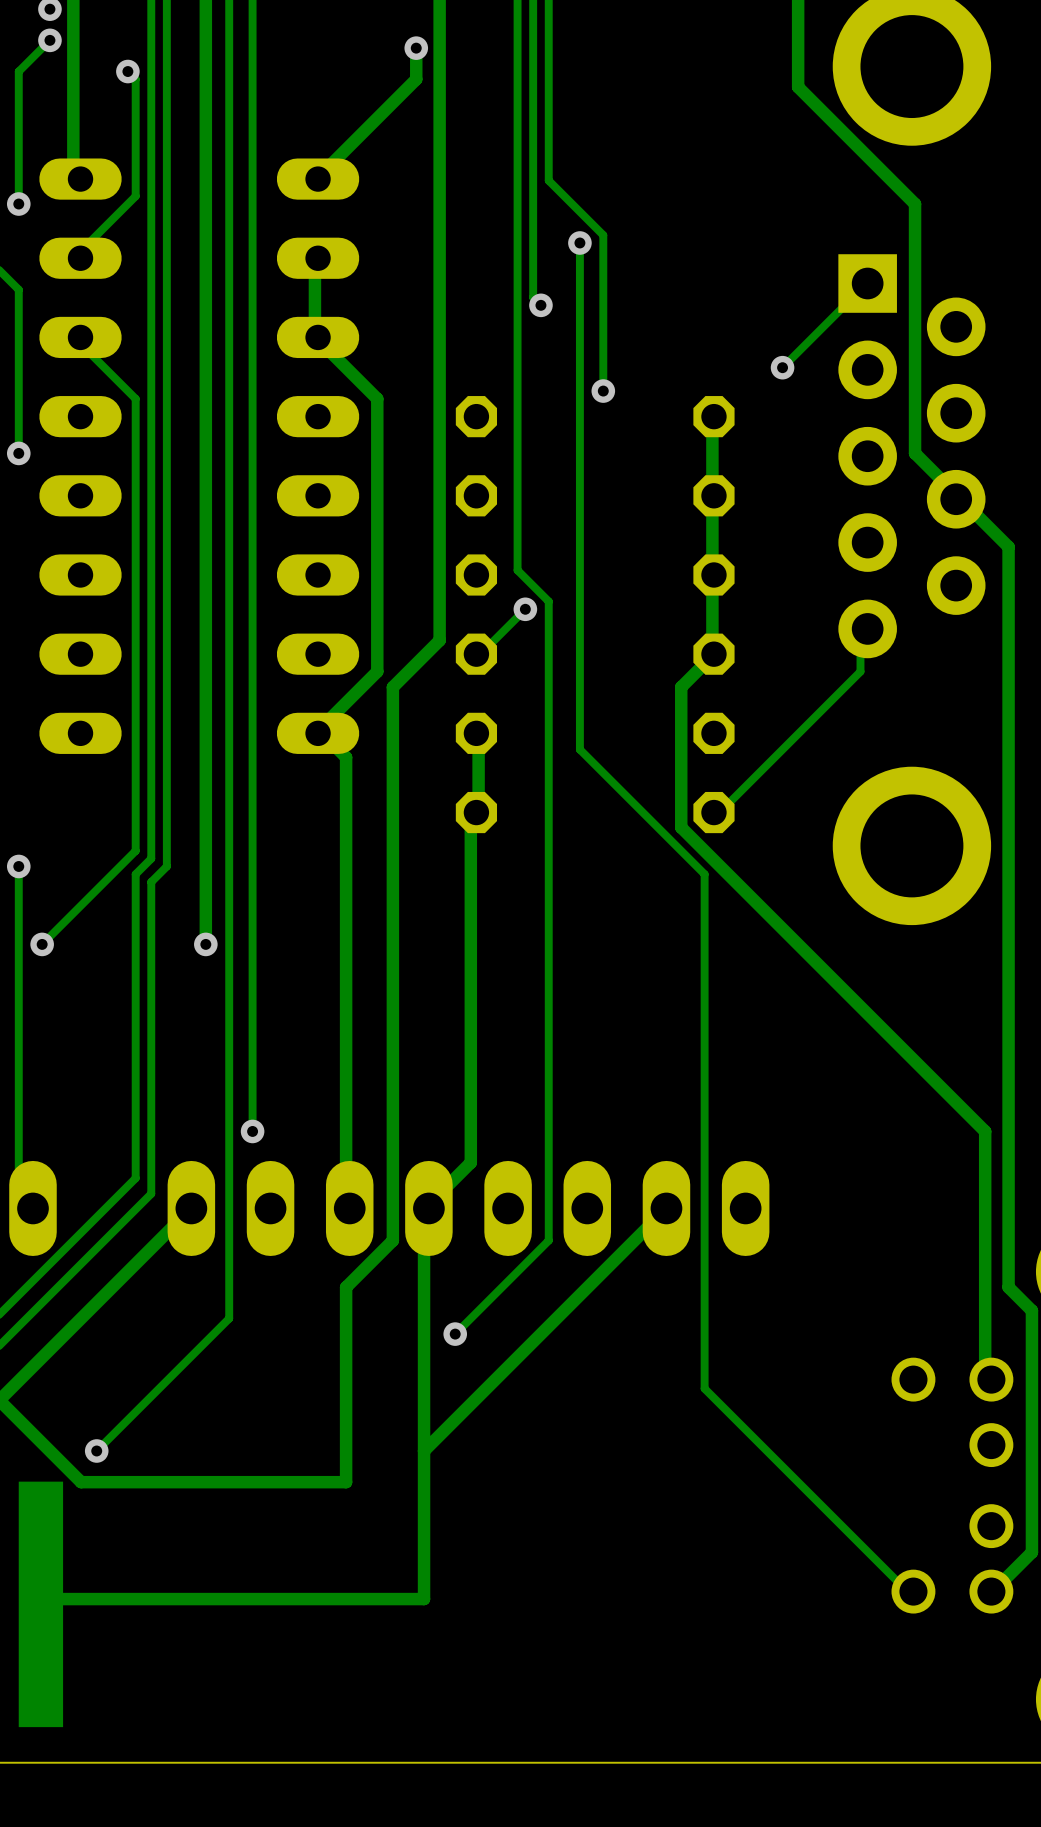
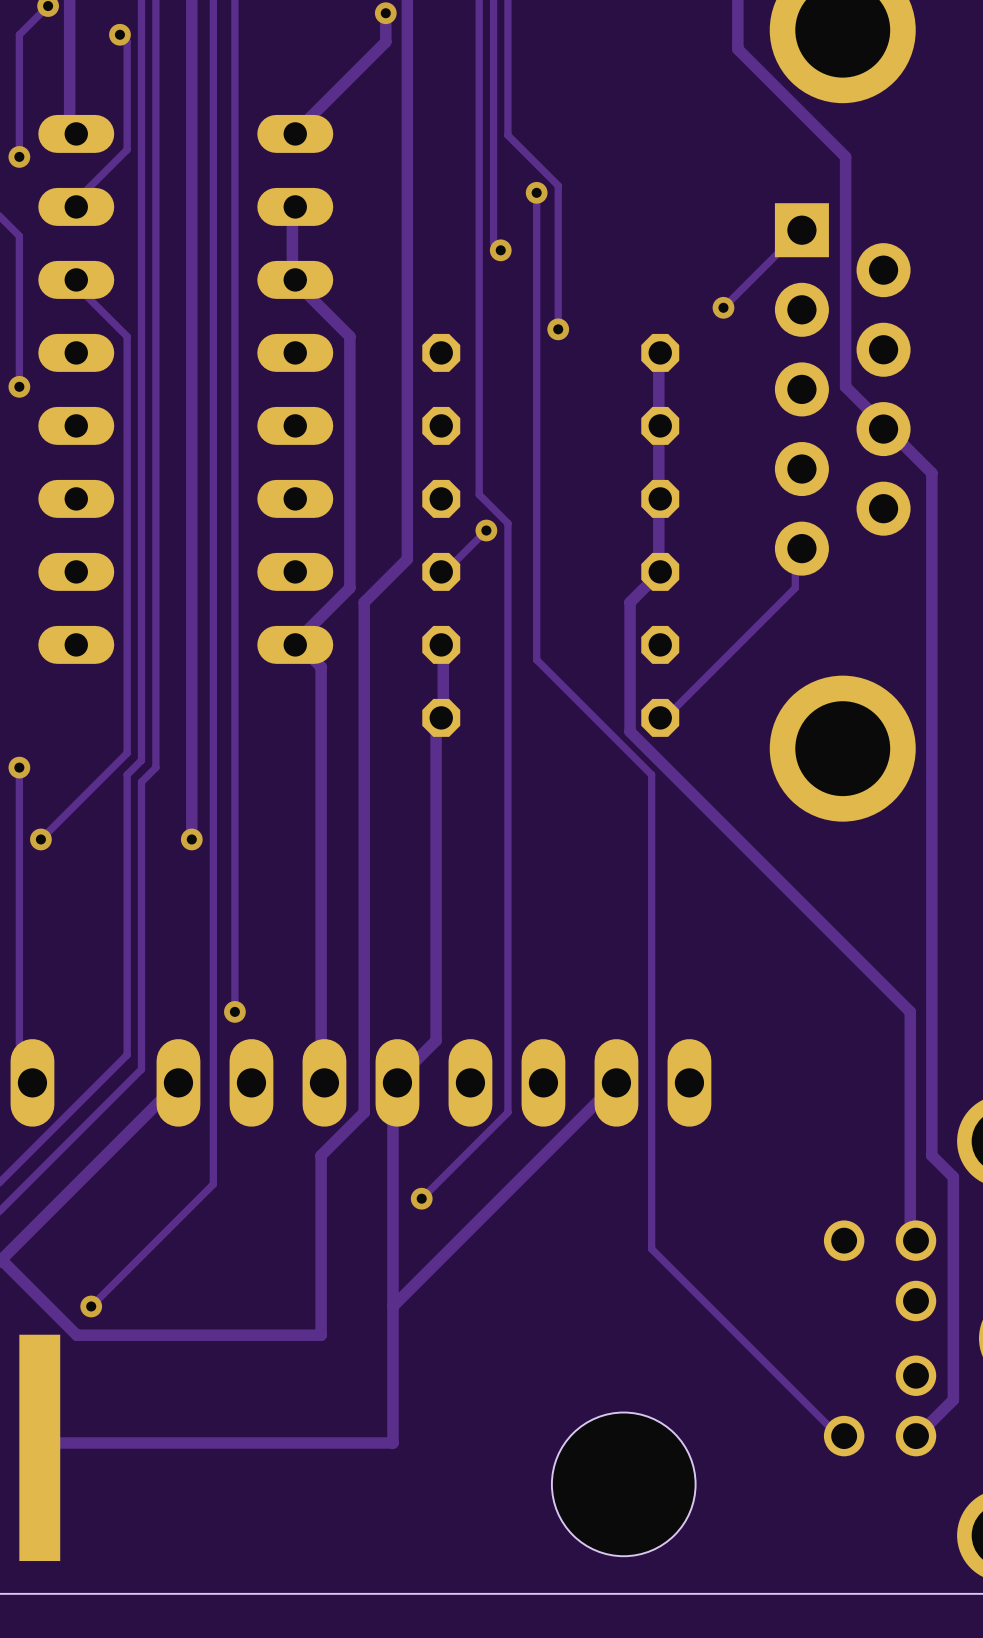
hole: none -> (623, 1484)

